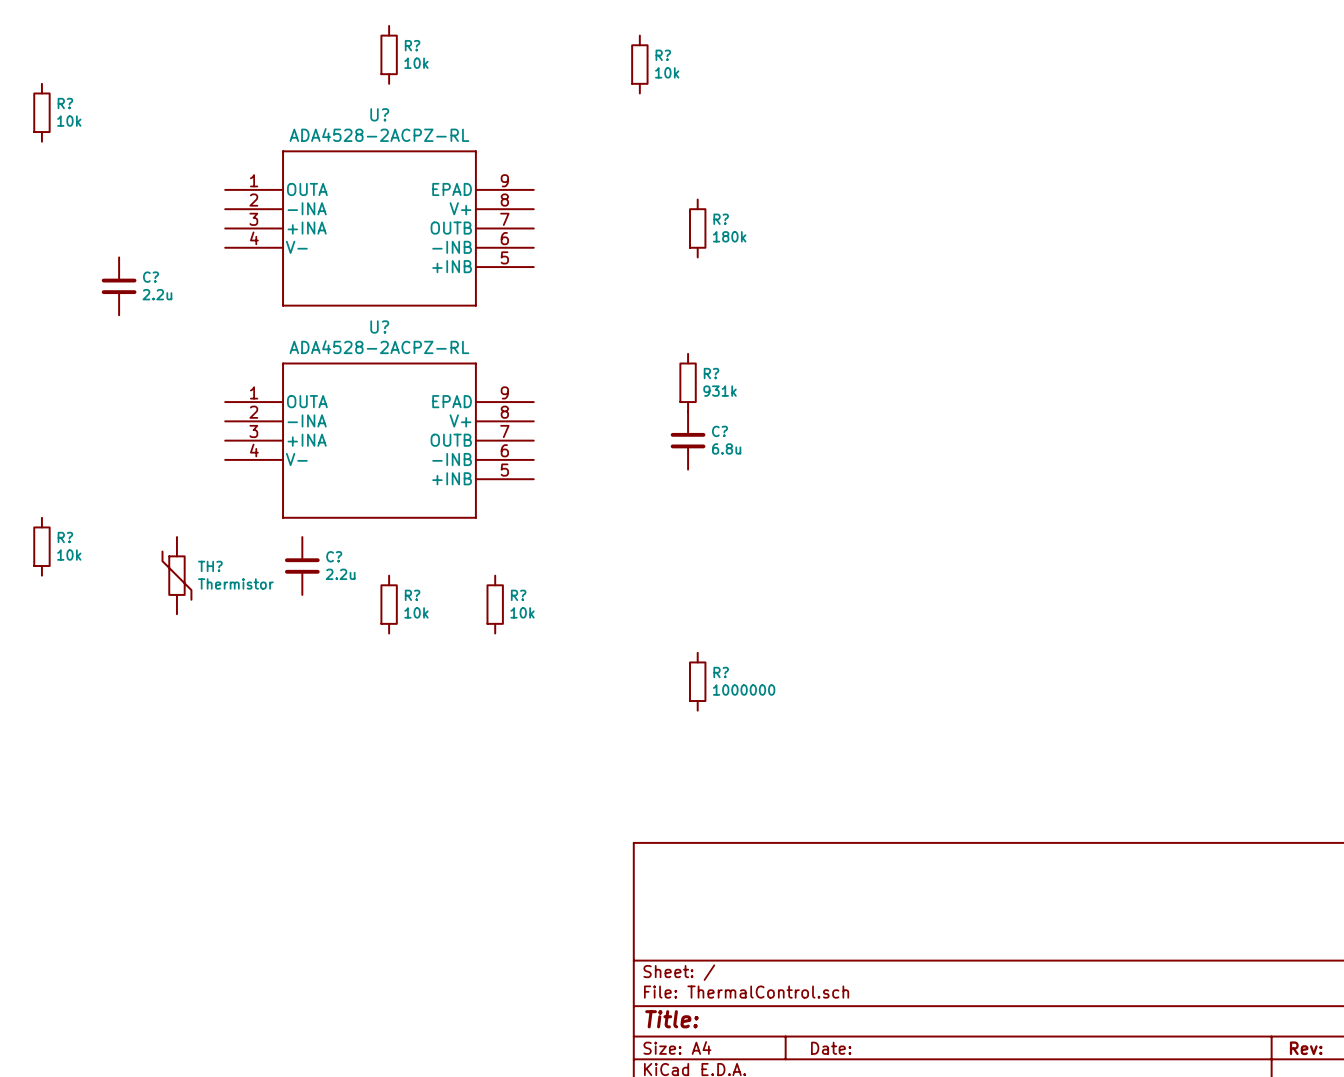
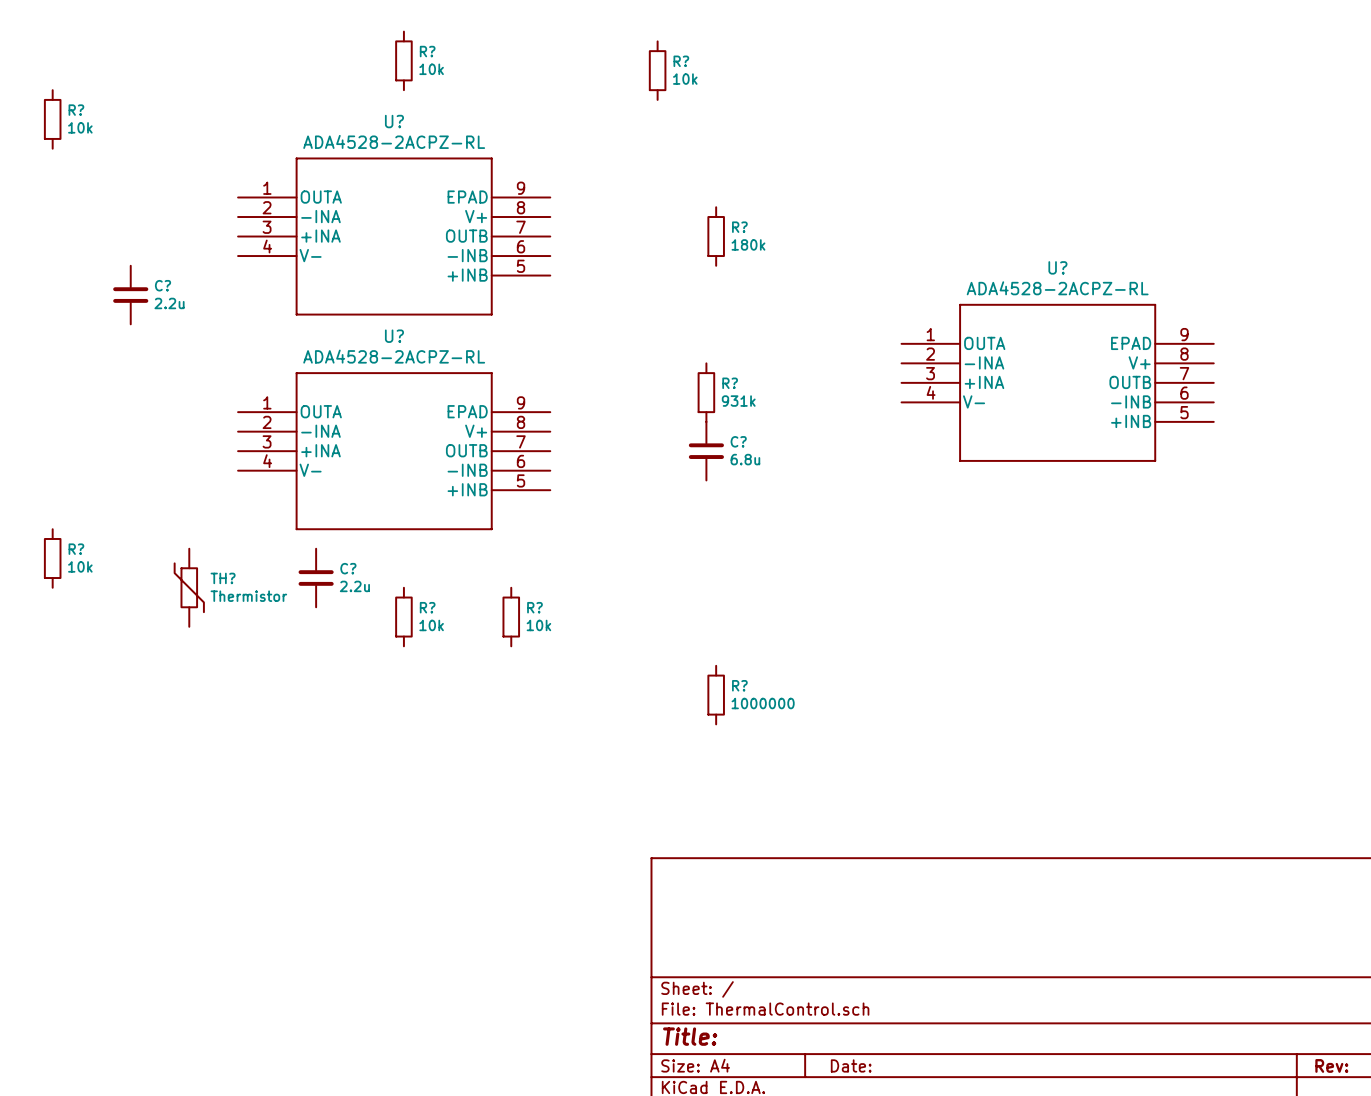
U?: none -> ADA4528-2ACPZ-RL (1057, 382)

